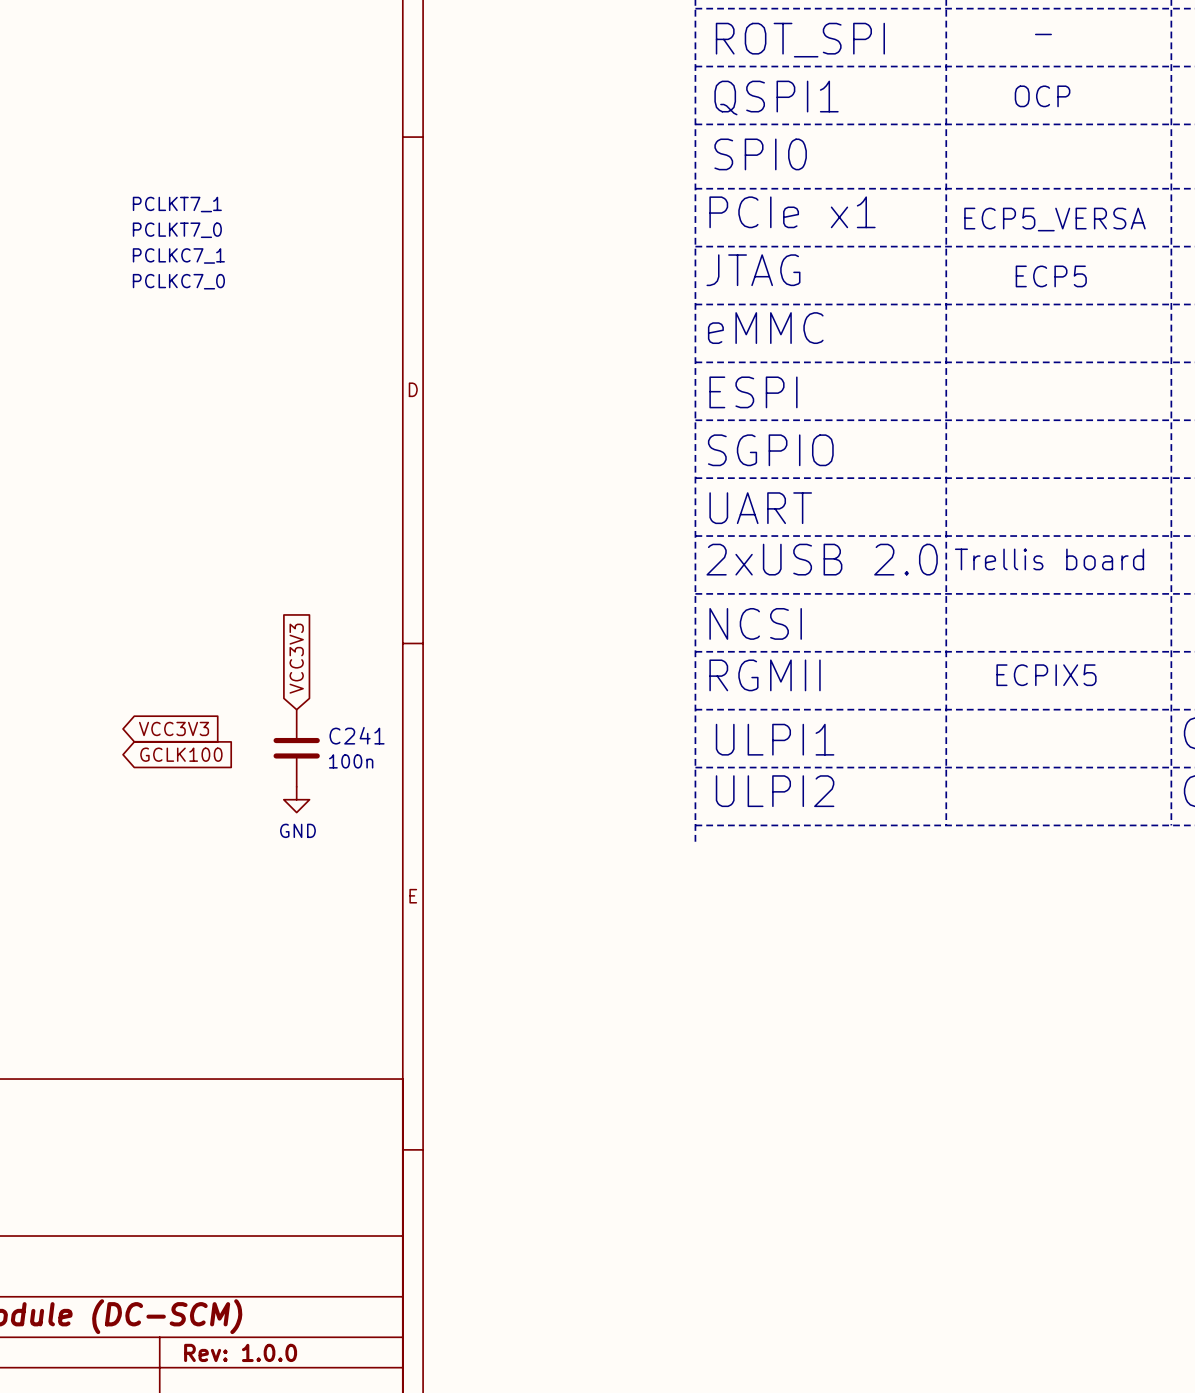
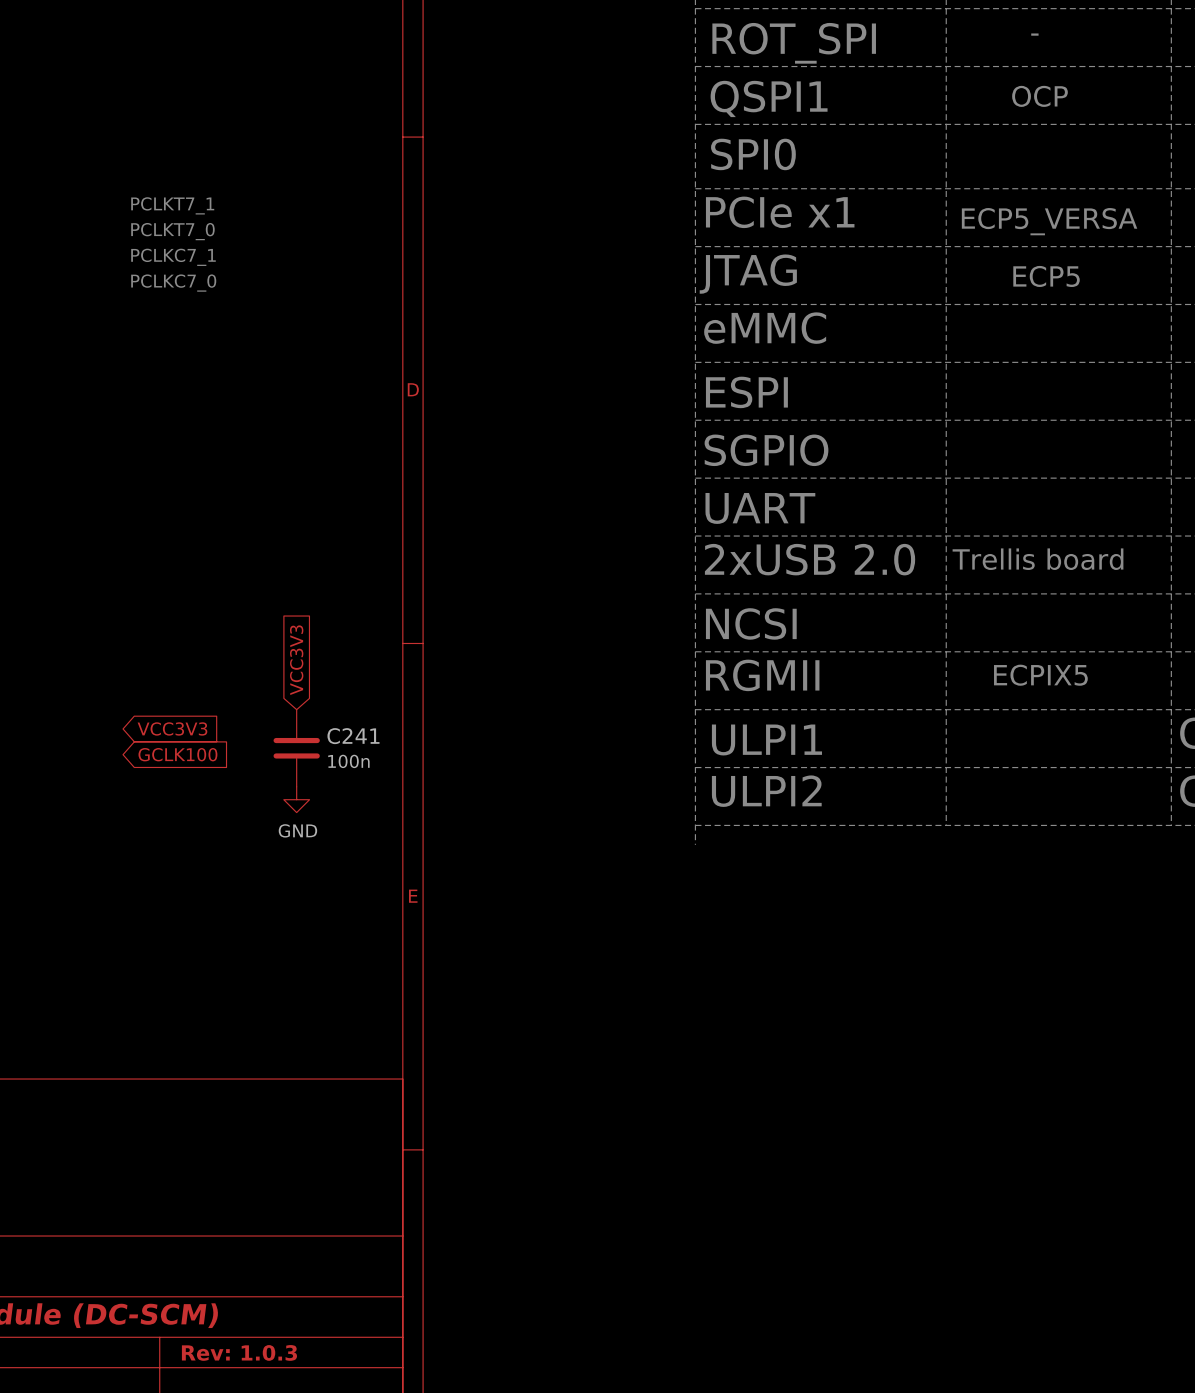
title block: Rev: 1.0.0 (240, 1352) -> Rev: 1.0.3 (239, 1352)

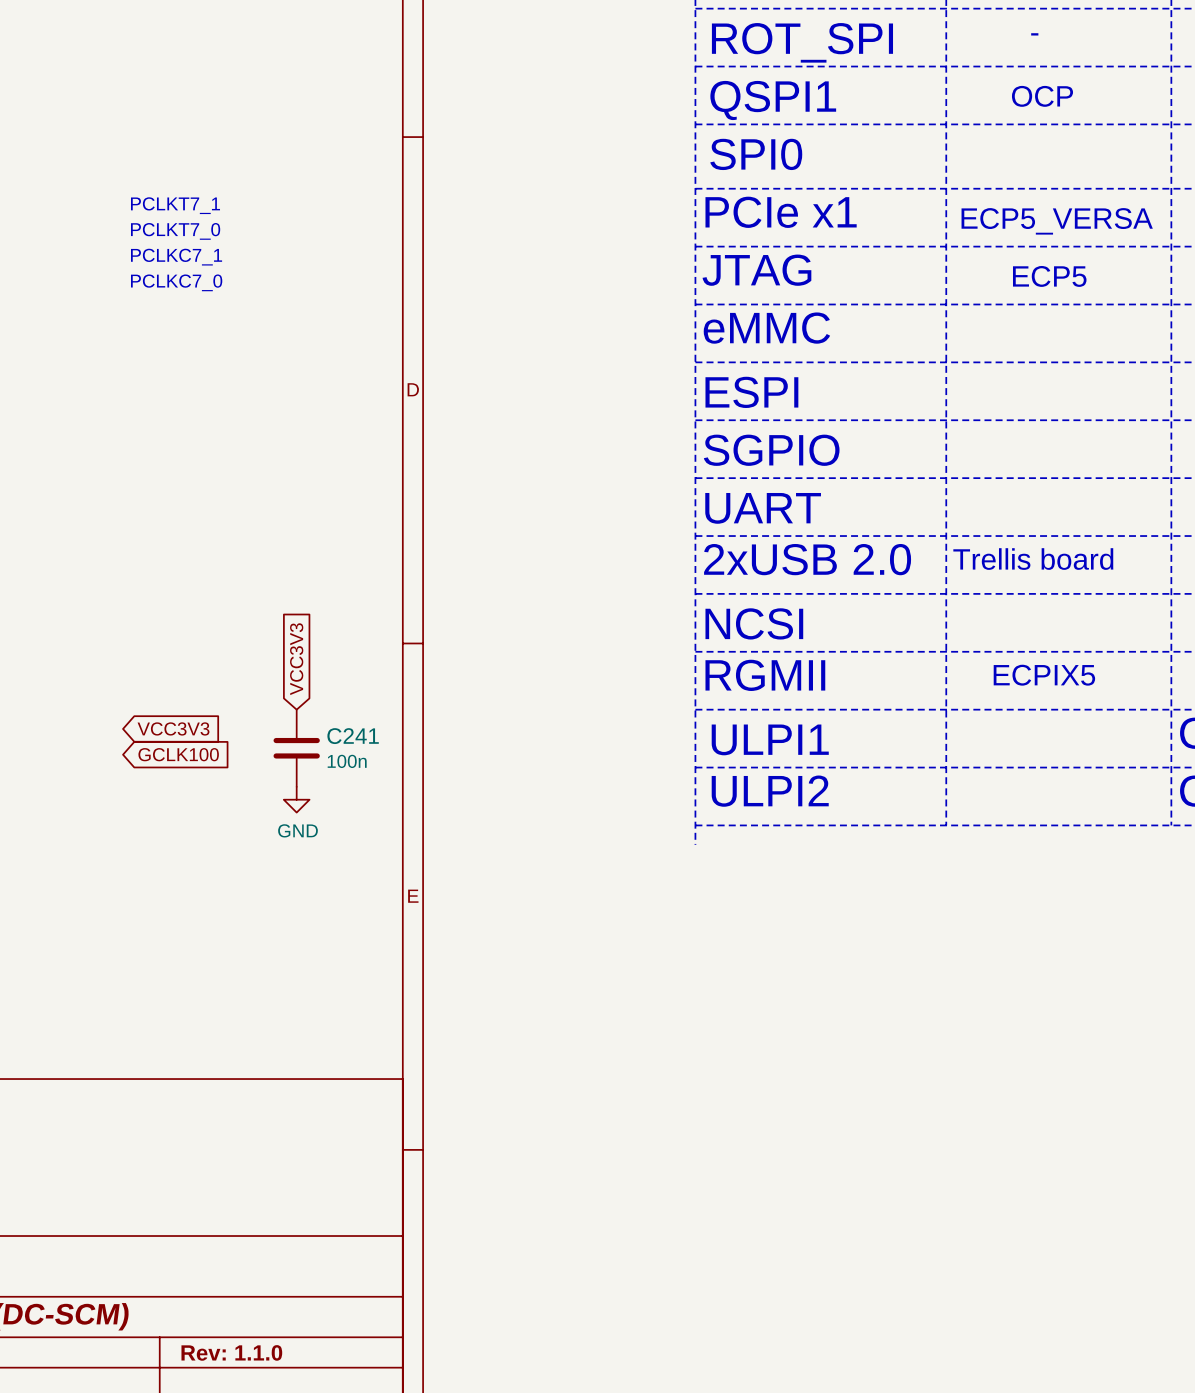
title block: Rev: 1.0.3 (239, 1352) -> Rev: 1.1.0 (231, 1352)

